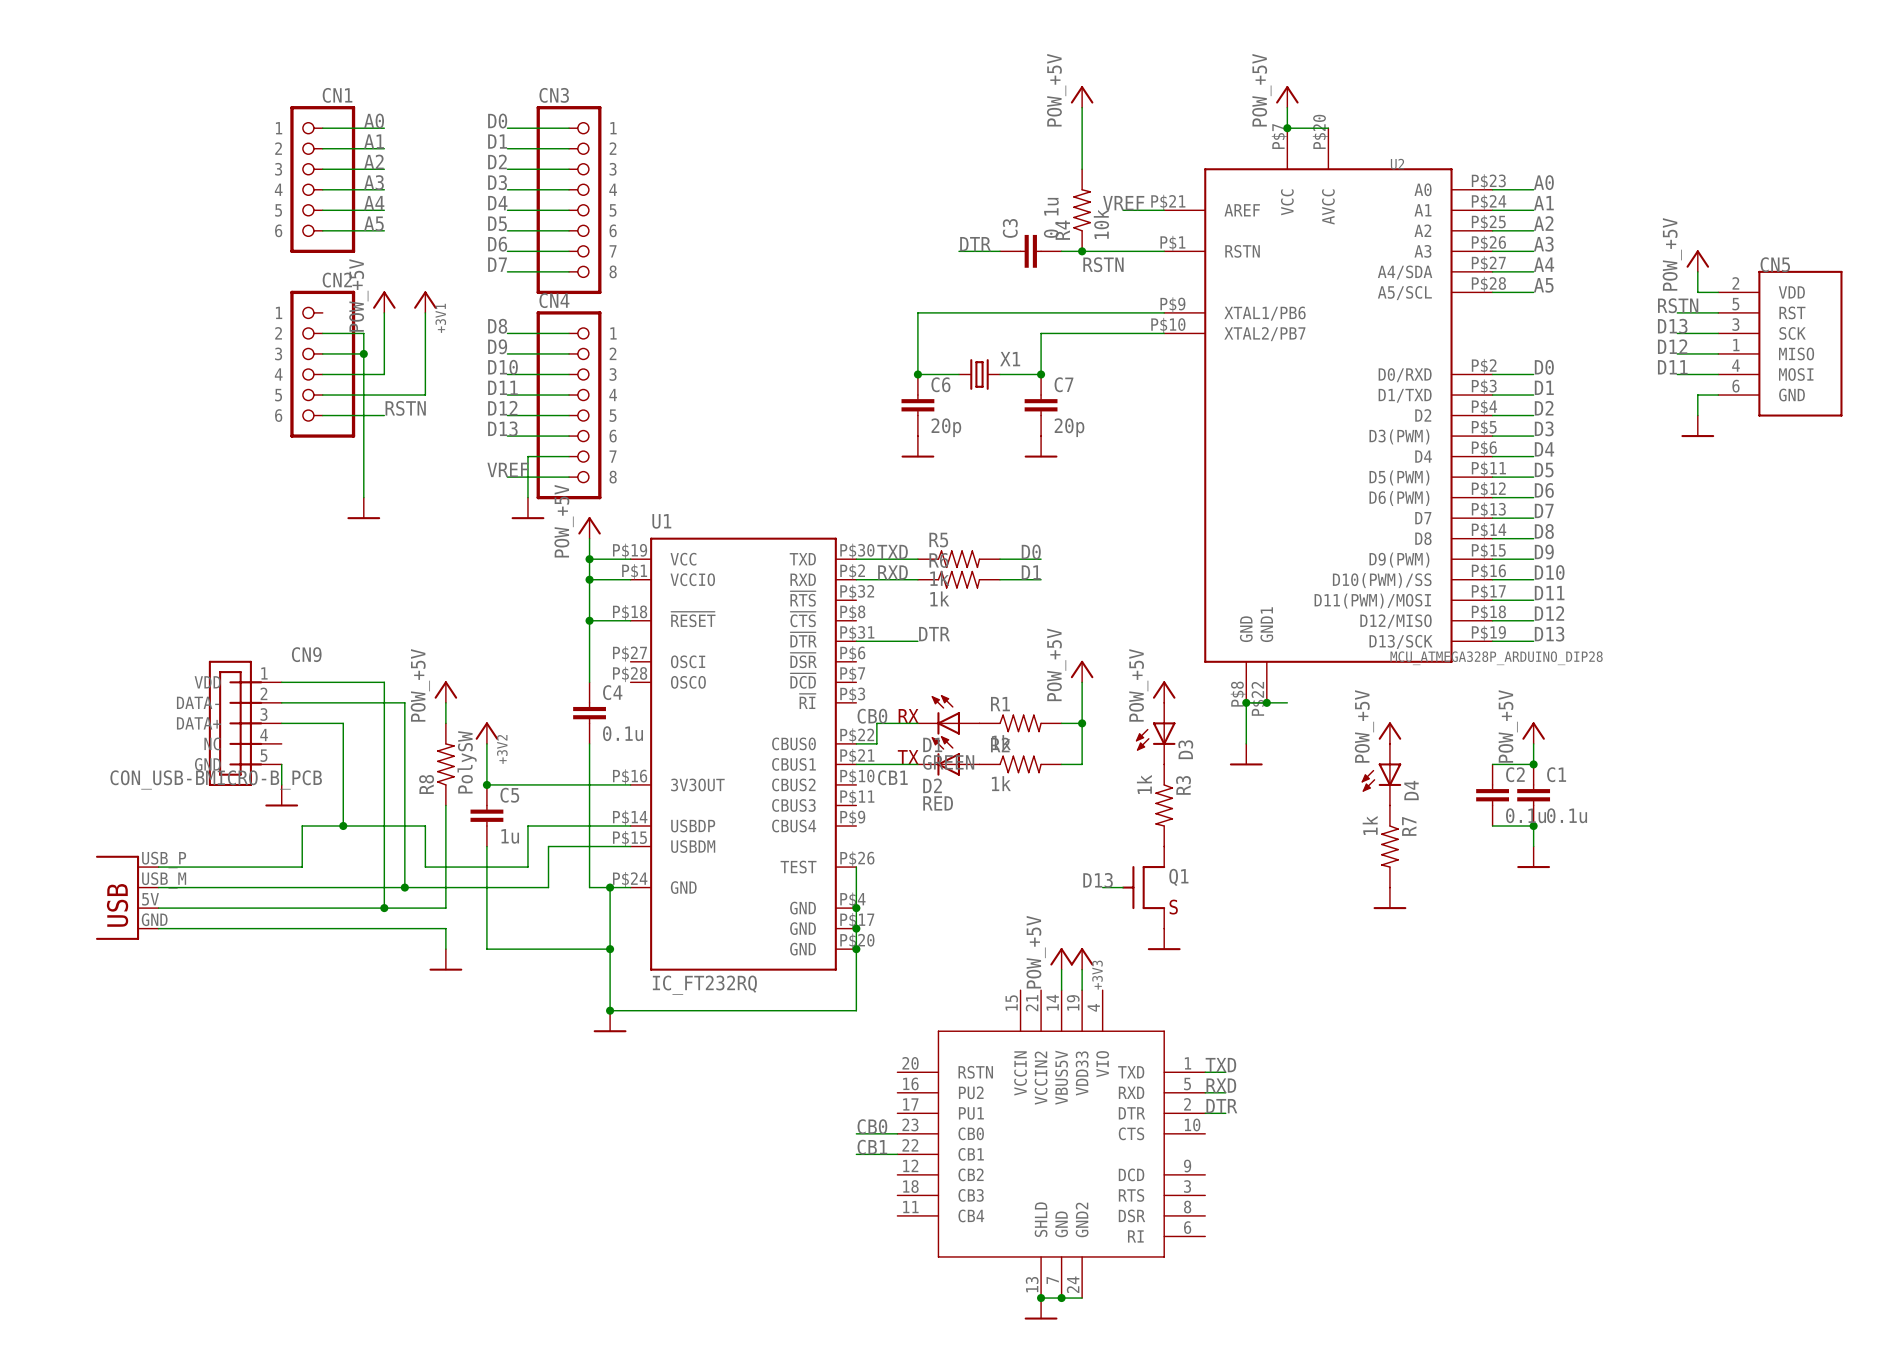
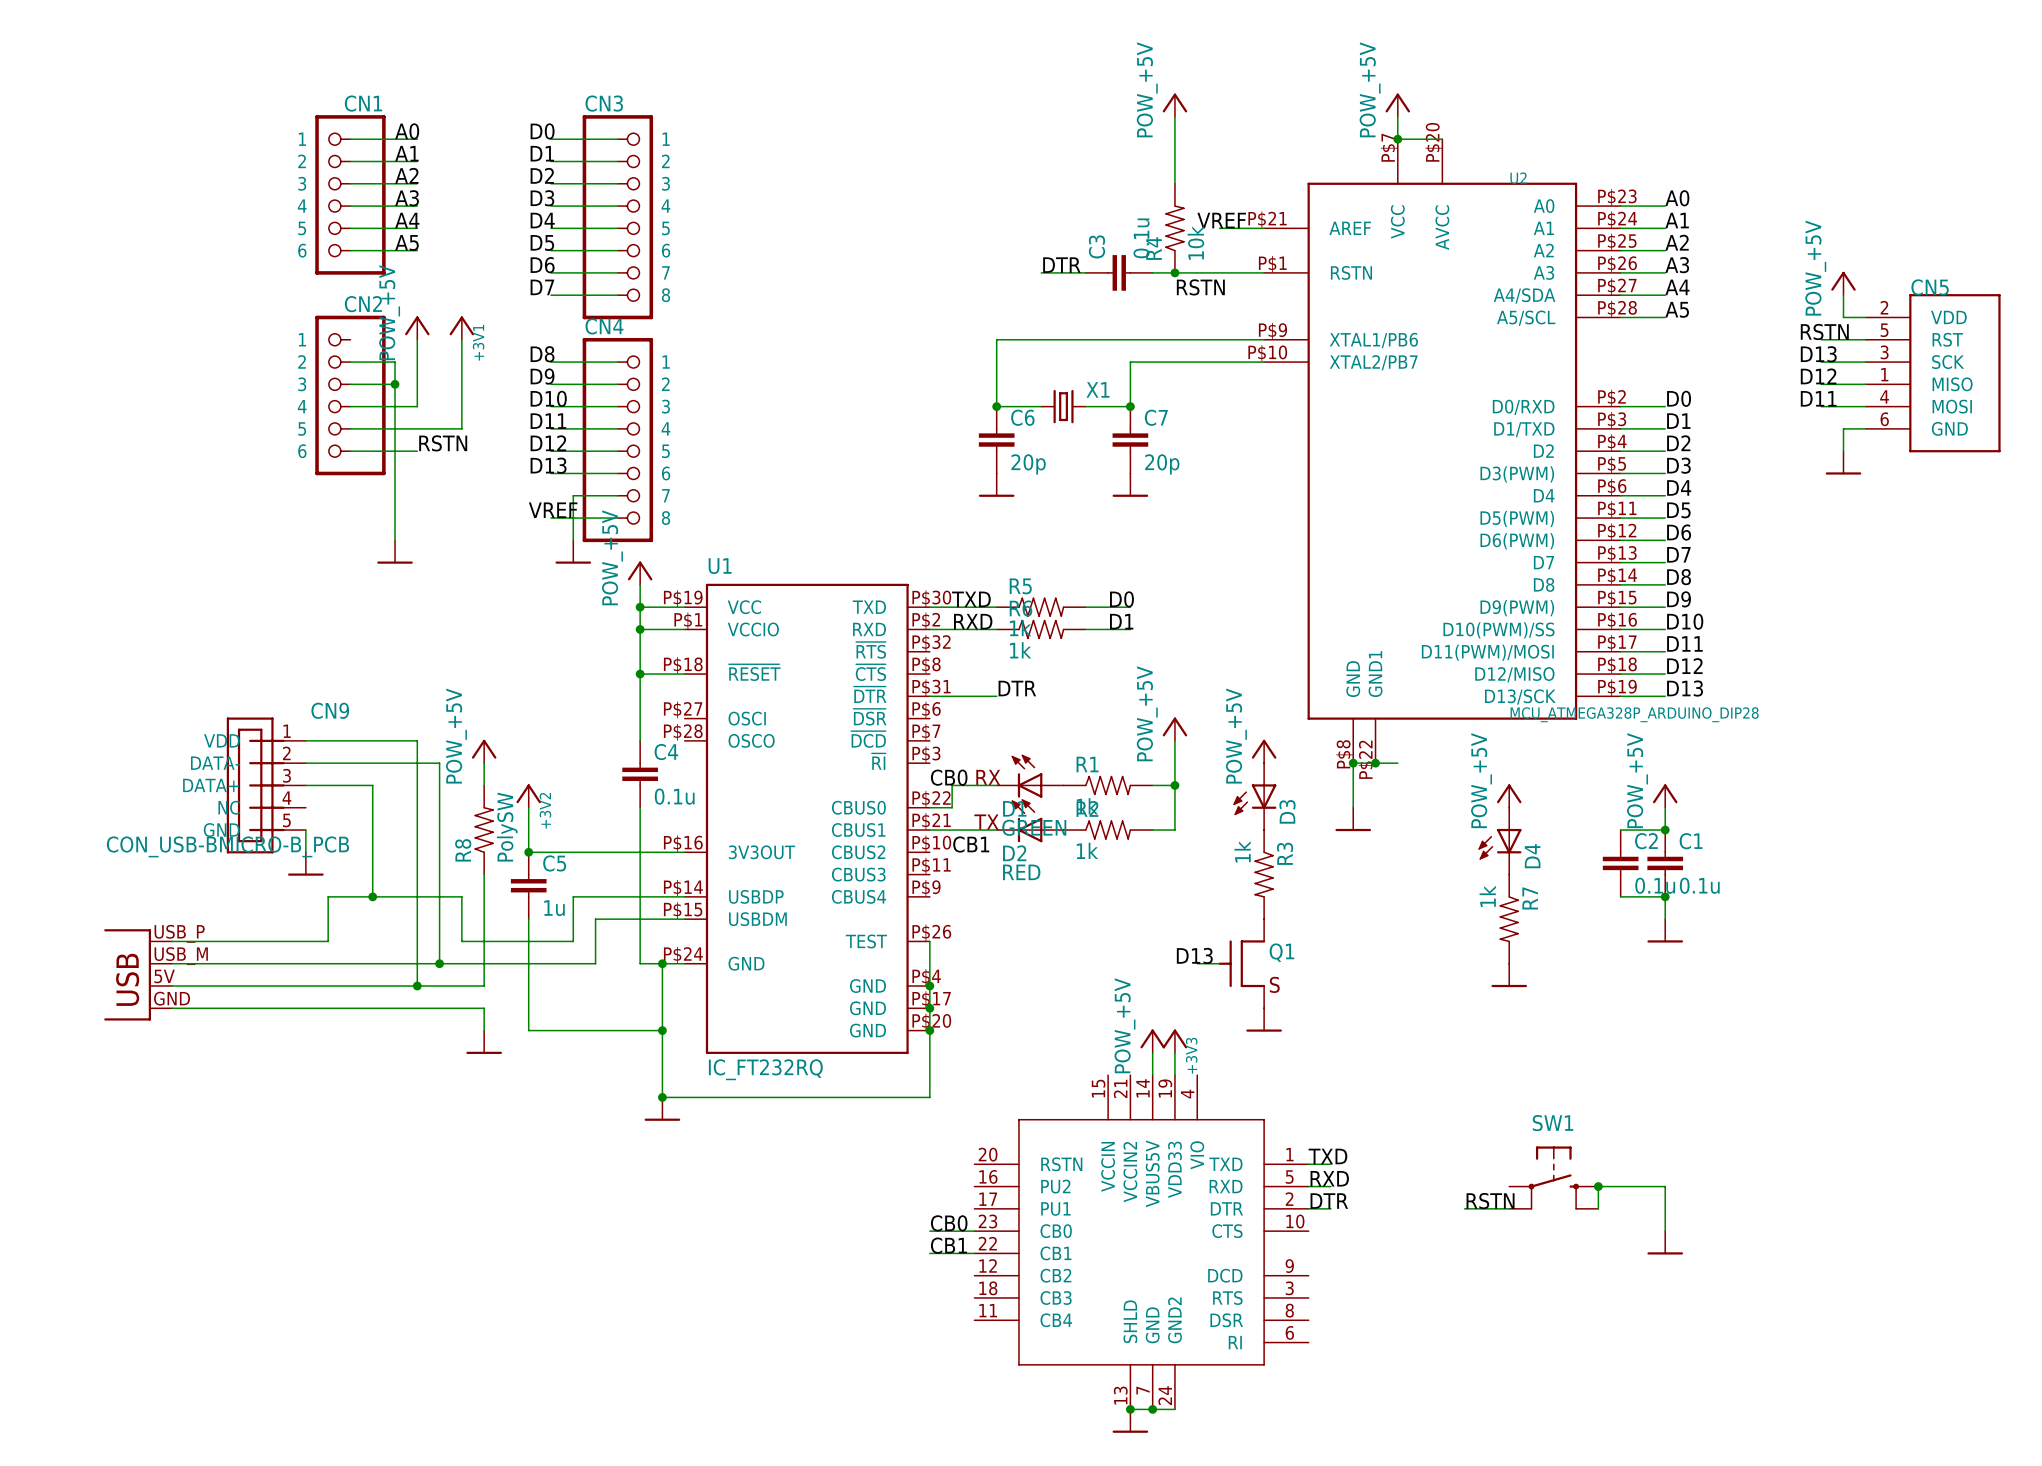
SW1: none -> (1553, 1177)
junction: none -> (1598, 1186)
label: none -> RSTN (1490, 1201)
wire: none -> (1464, 1208) (1509, 1208)
wire: none -> (1598, 1208) (1598, 1186) (1665, 1186) (1665, 1231)
power symbol: none -> (1665, 1242)

